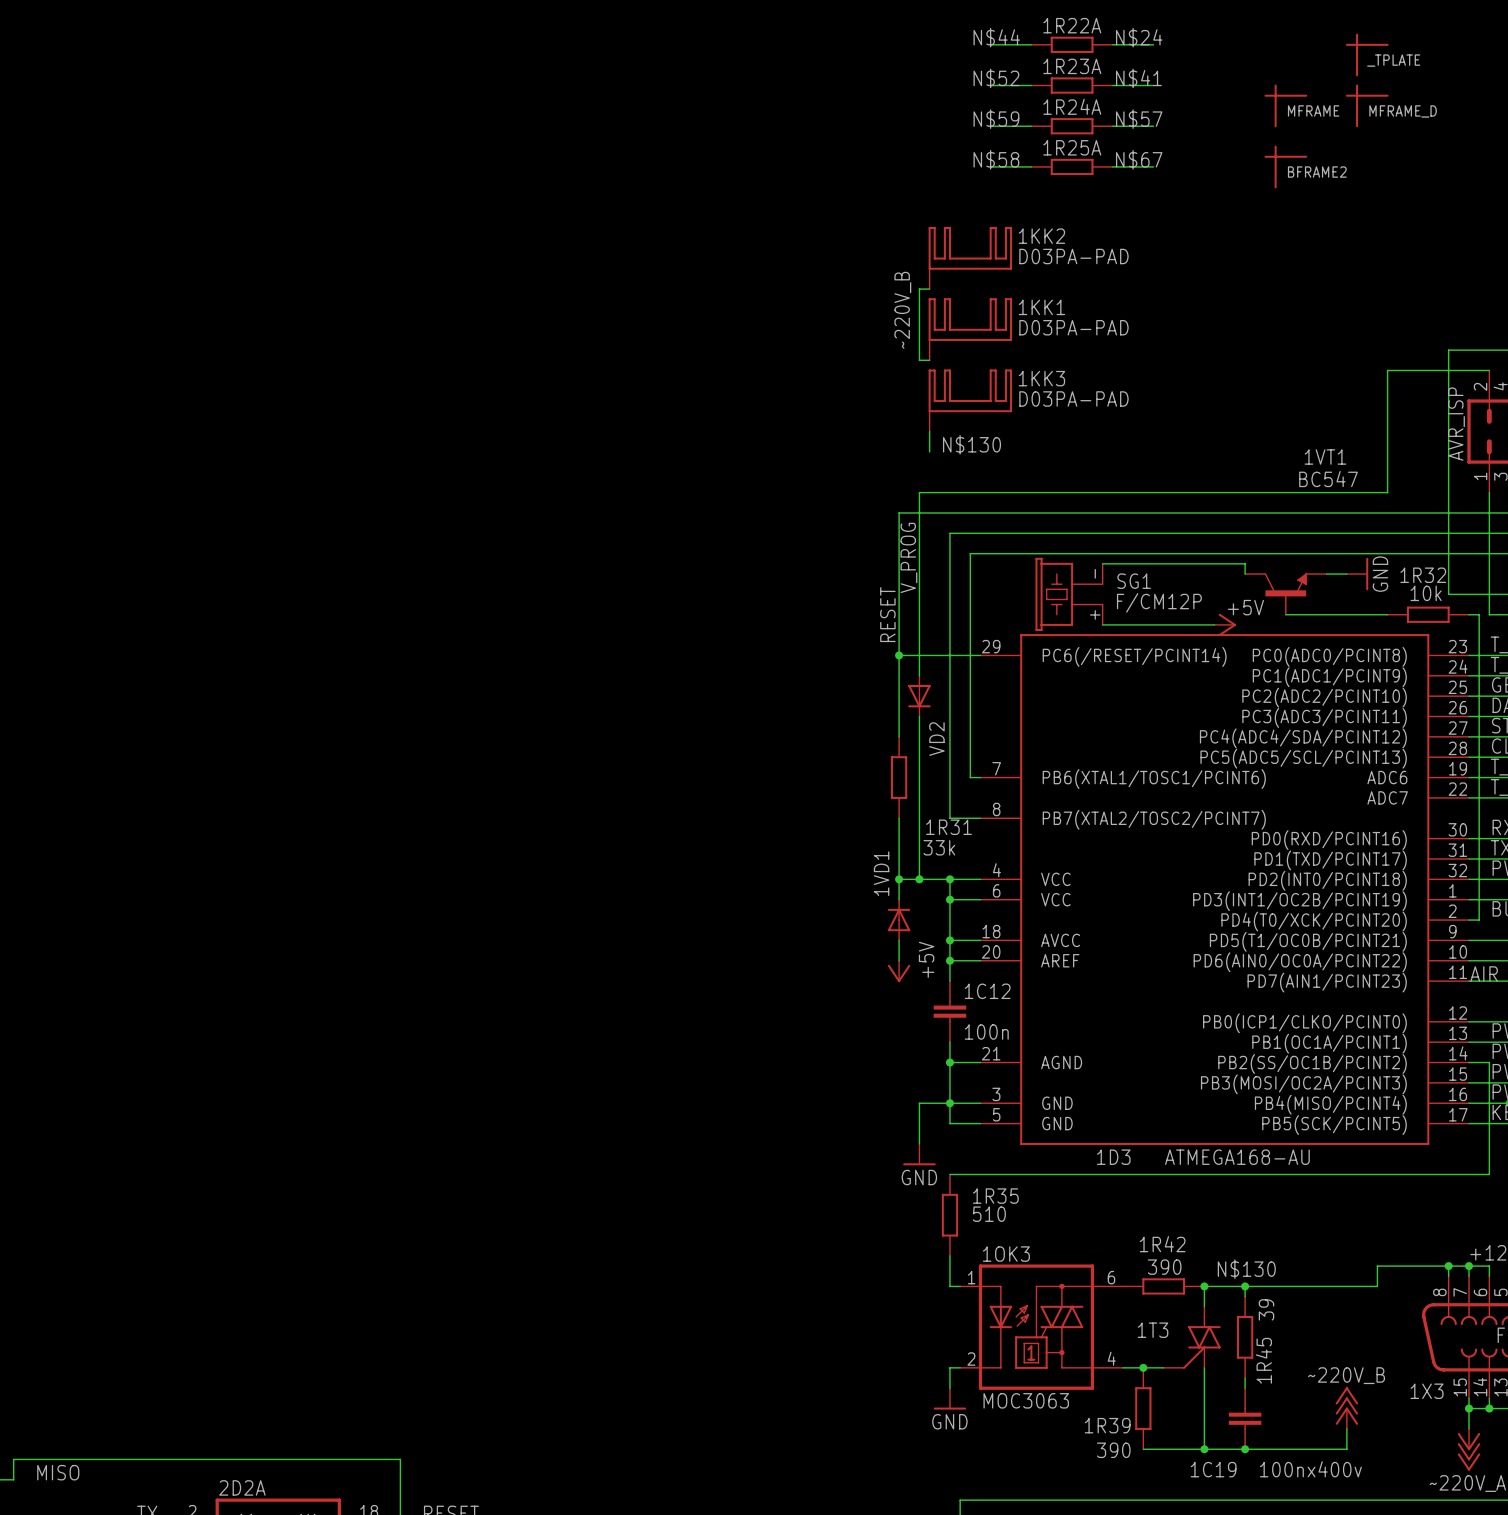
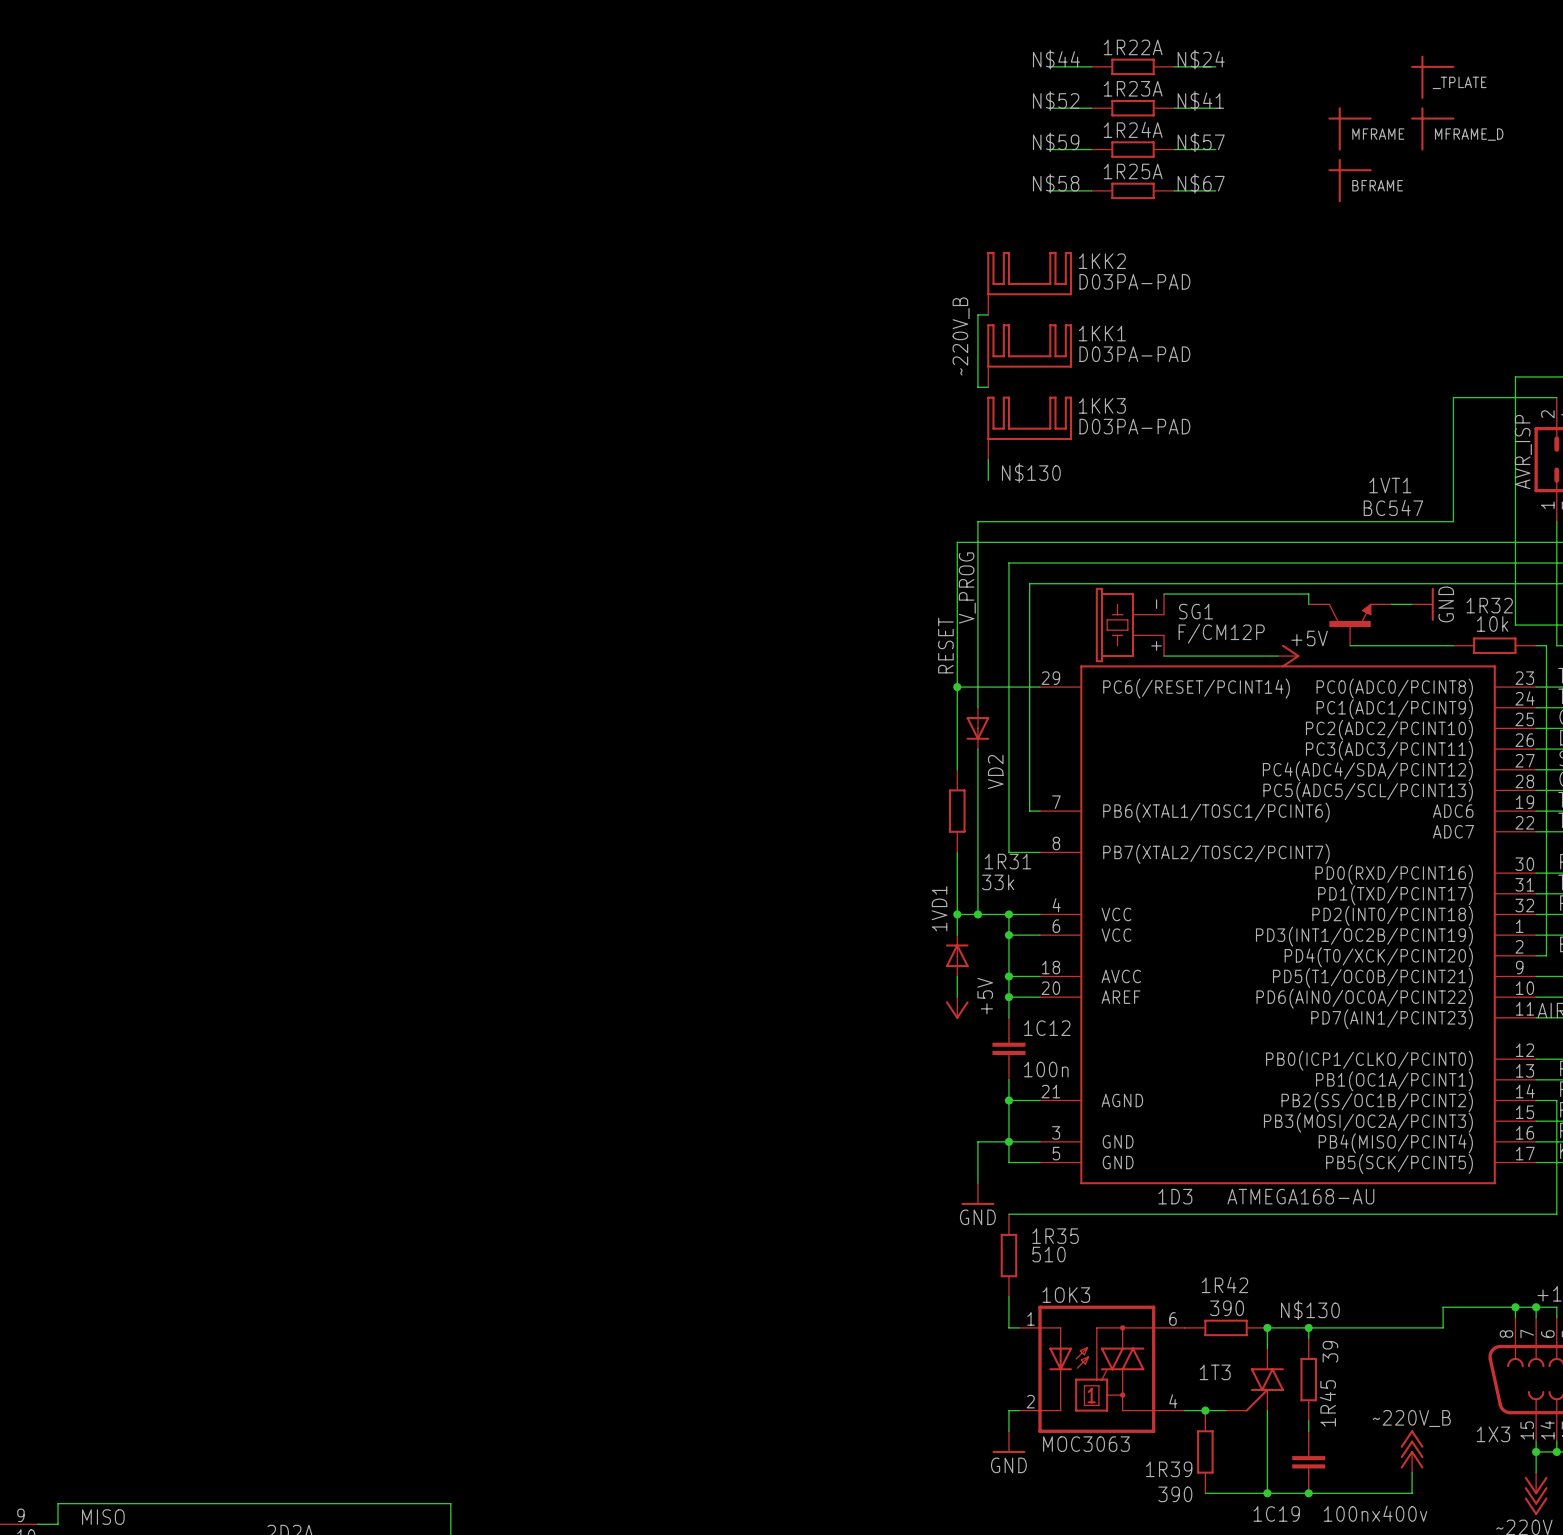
BFRAME: none -> (1350, 180)
BFRAME2: (1285, 166) -> none

